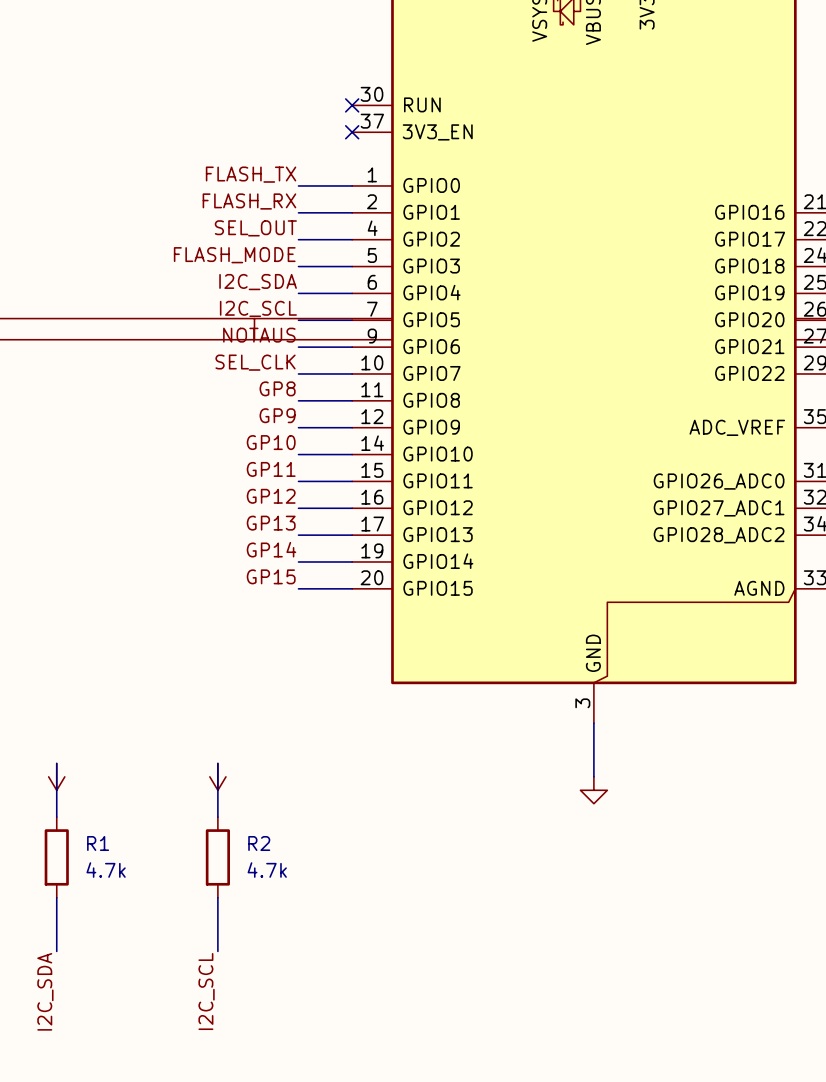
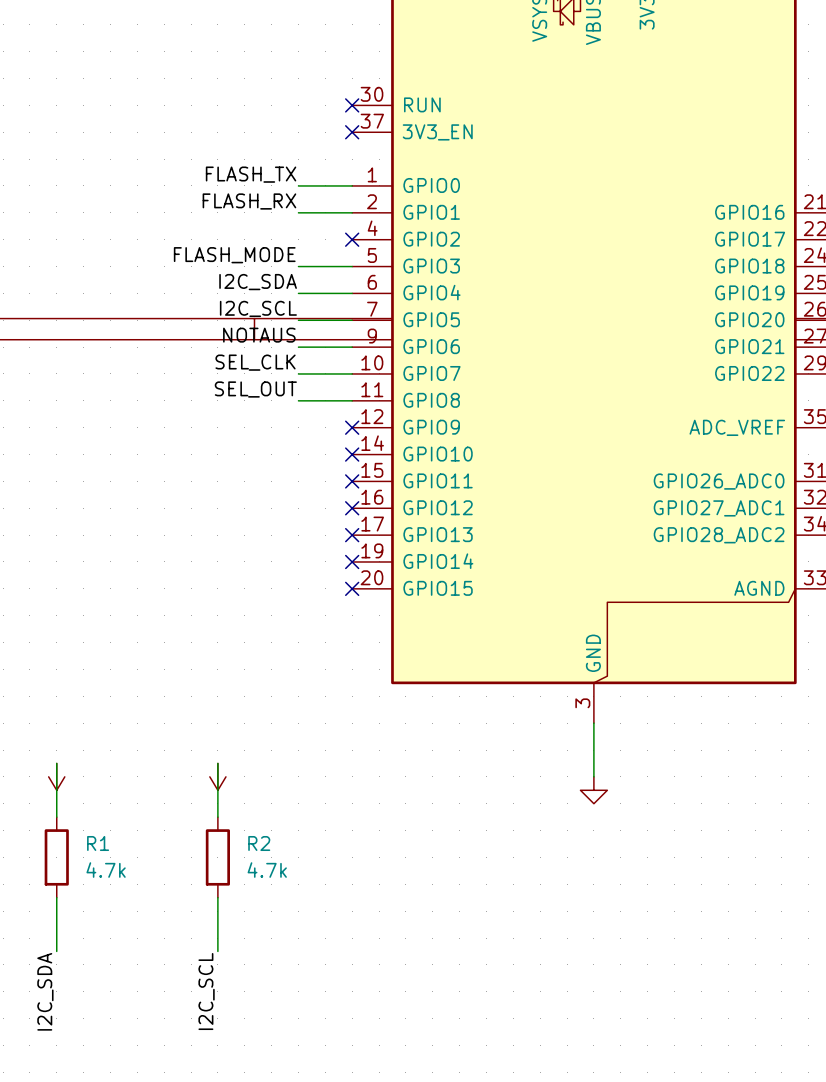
label: SEL_OUT (255, 228) -> none
wire: (298, 239) (352, 239) -> none
no-connect mark: none -> (352, 239)
label: GP8 (277, 388) -> SEL_OUT (255, 389)
label: GP9 (277, 415) -> none
wire: (298, 427) (352, 427) -> none
no-connect mark: none -> (352, 427)
label: GP10 (271, 442) -> none
wire: (298, 454) (352, 454) -> none
no-connect mark: none -> (352, 454)
label: GP11 (271, 469) -> none
wire: (298, 481) (352, 481) -> none
no-connect mark: none -> (352, 481)
label: GP12 (271, 496) -> none
wire: (298, 508) (352, 508) -> none
no-connect mark: none -> (352, 508)
label: GP13 (271, 523) -> none
wire: (298, 535) (352, 535) -> none
no-connect mark: none -> (352, 535)
label: GP14 (271, 549) -> none
wire: (298, 561) (352, 561) -> none
no-connect mark: none -> (352, 561)
label: GP15 (271, 576) -> none
wire: (298, 588) (352, 588) -> none
no-connect mark: none -> (352, 588)

